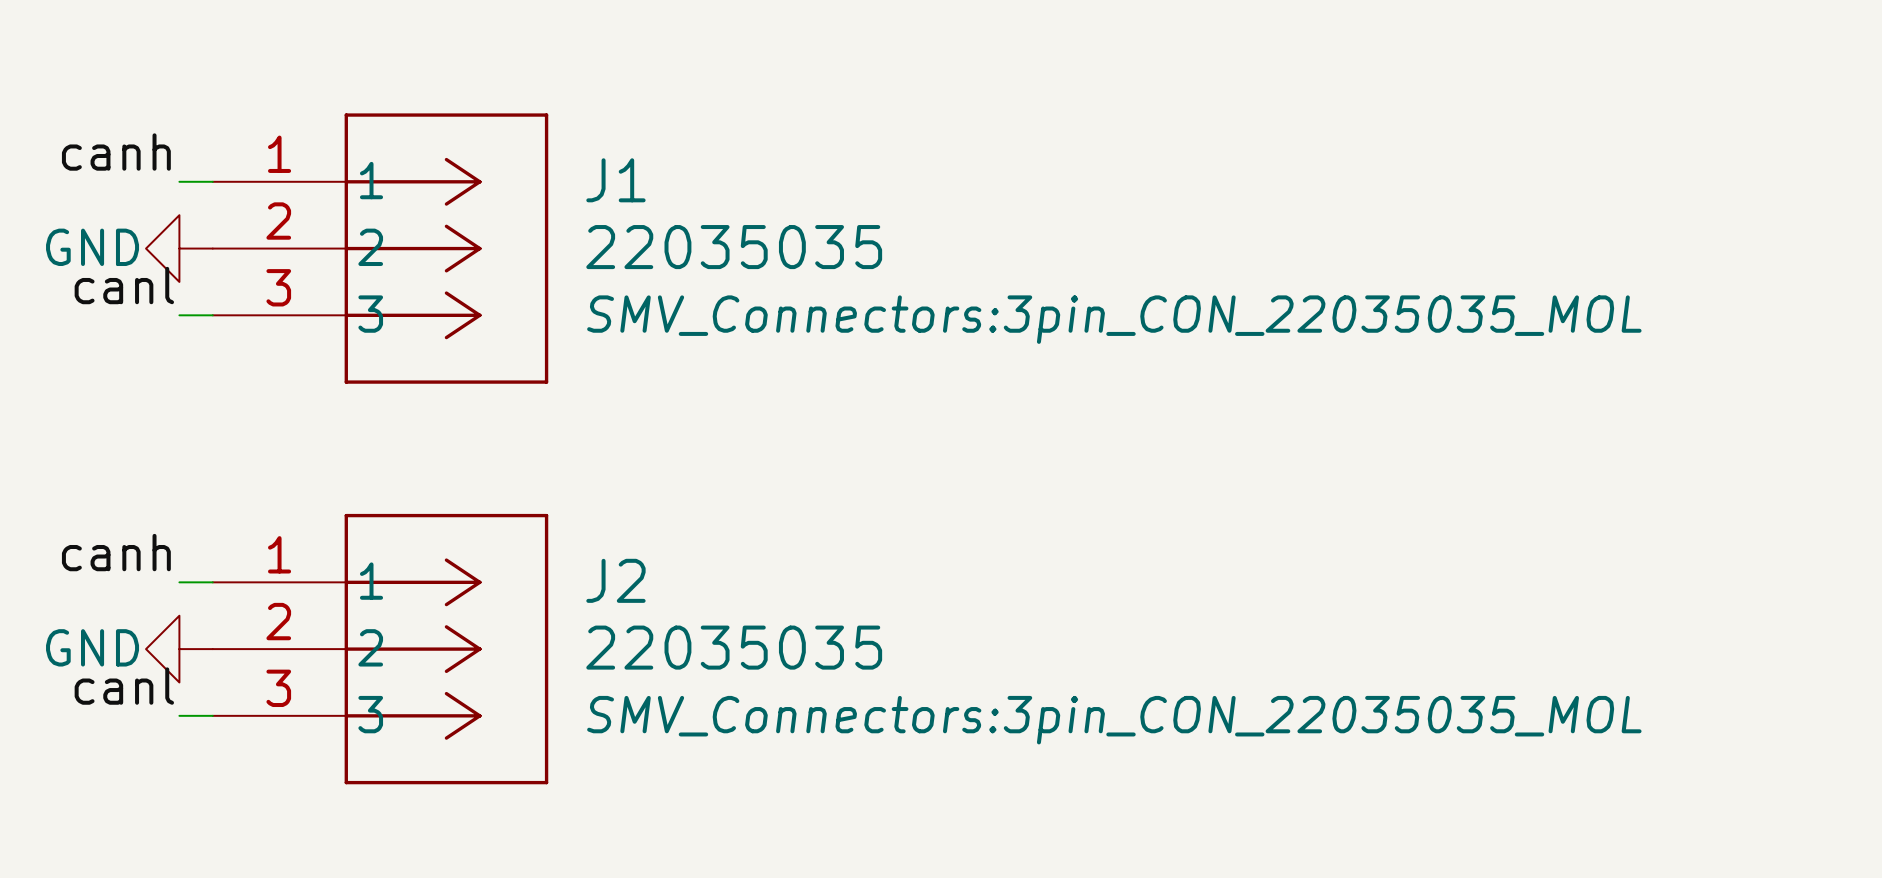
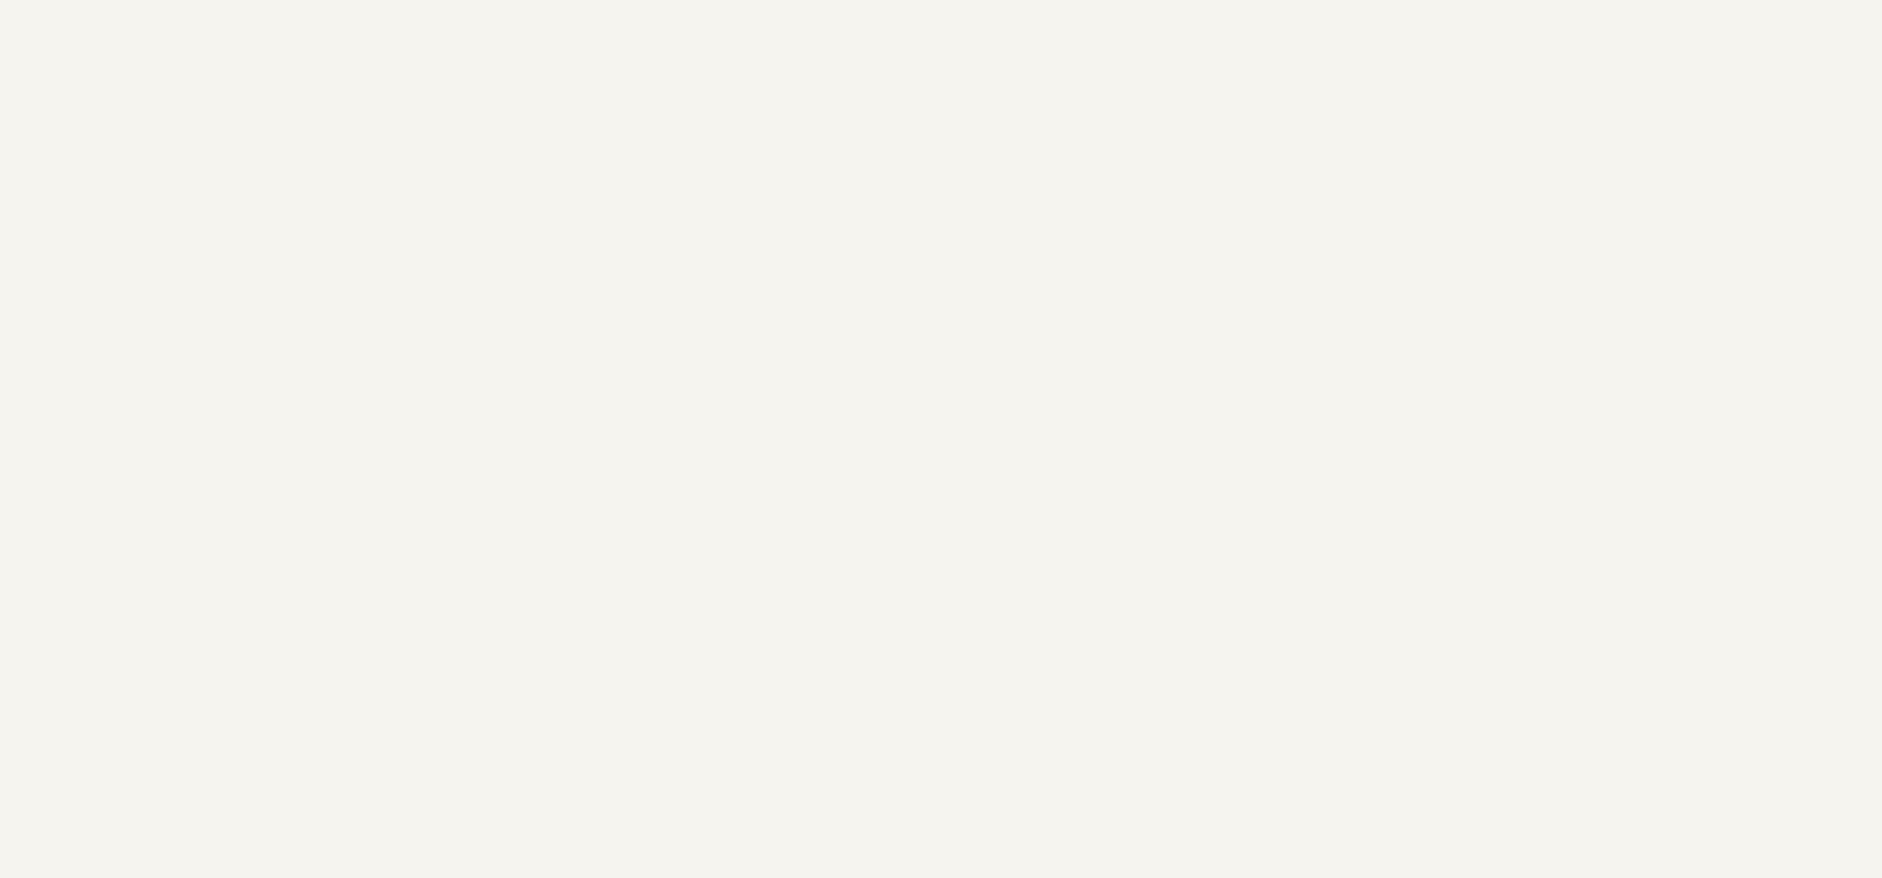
label: canh (116, 152) -> none
wire: (179, 181) (212, 181) -> none
power symbol: GND (179, 248) -> none
J1: 22035035 (380, 248) -> none
label: canl (124, 285) -> none
wire: (179, 315) (212, 315) -> none
label: canh (116, 552) -> none
wire: (179, 582) (212, 582) -> none
power symbol: GND (179, 649) -> none
J2: 22035035 (380, 649) -> none
label: canl (124, 686) -> none
wire: (179, 715) (212, 715) -> none

